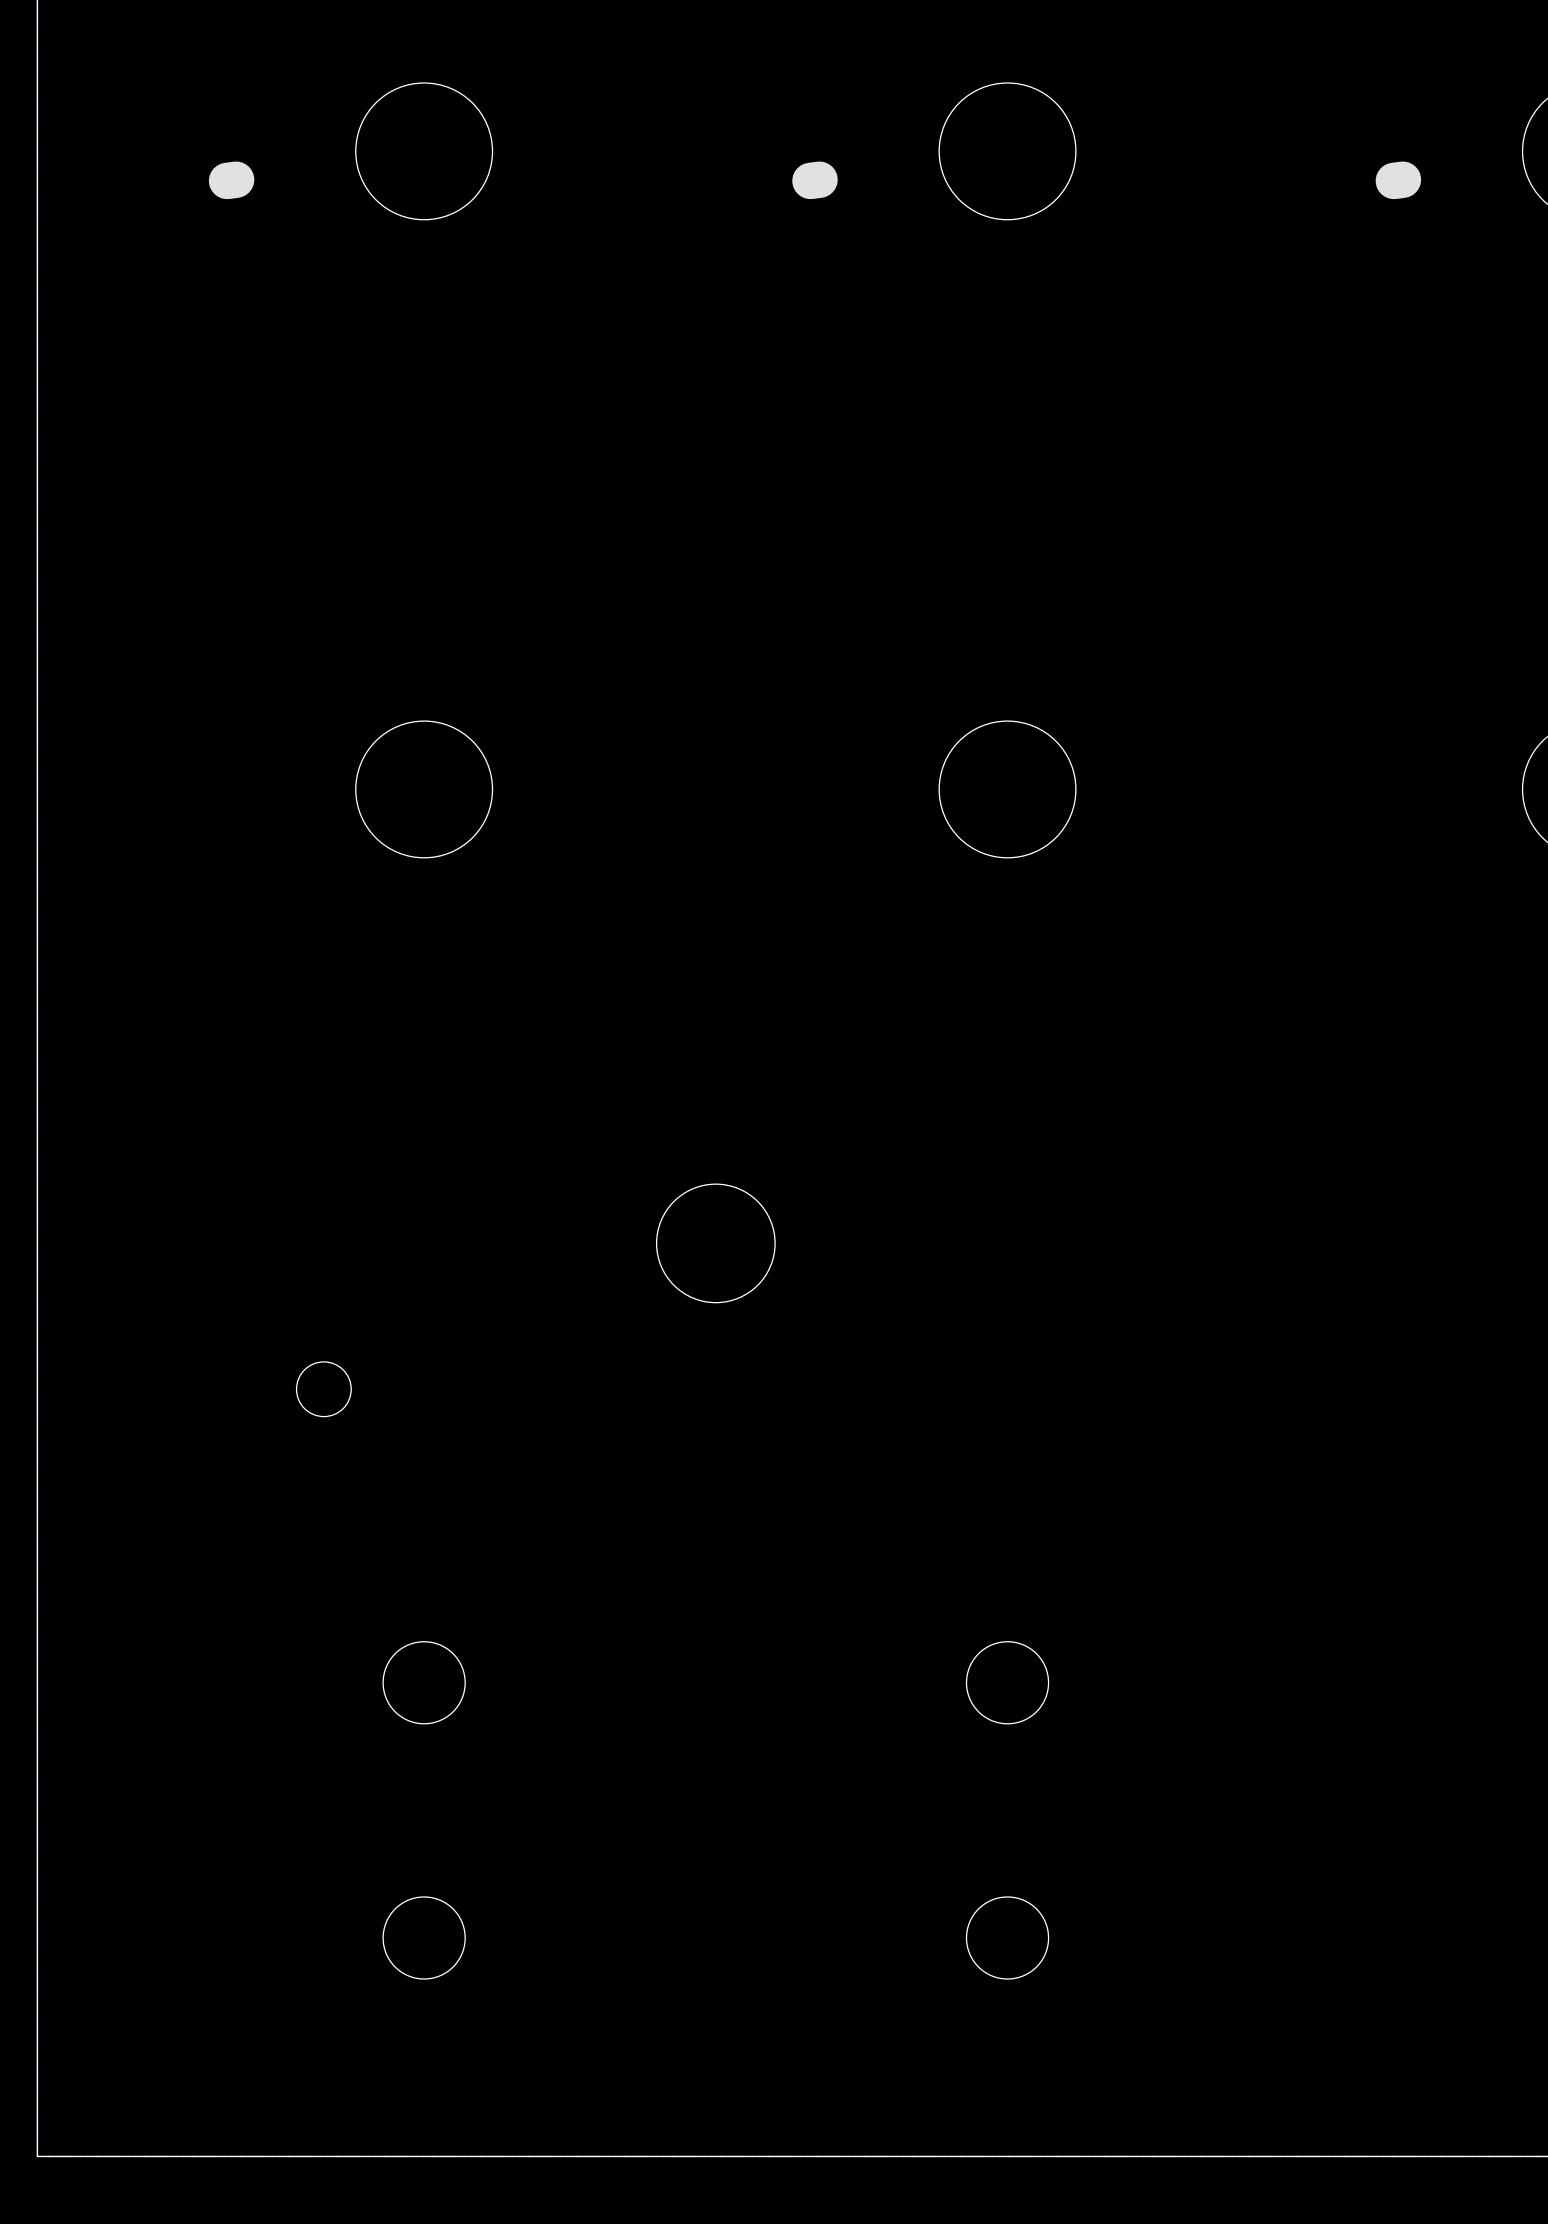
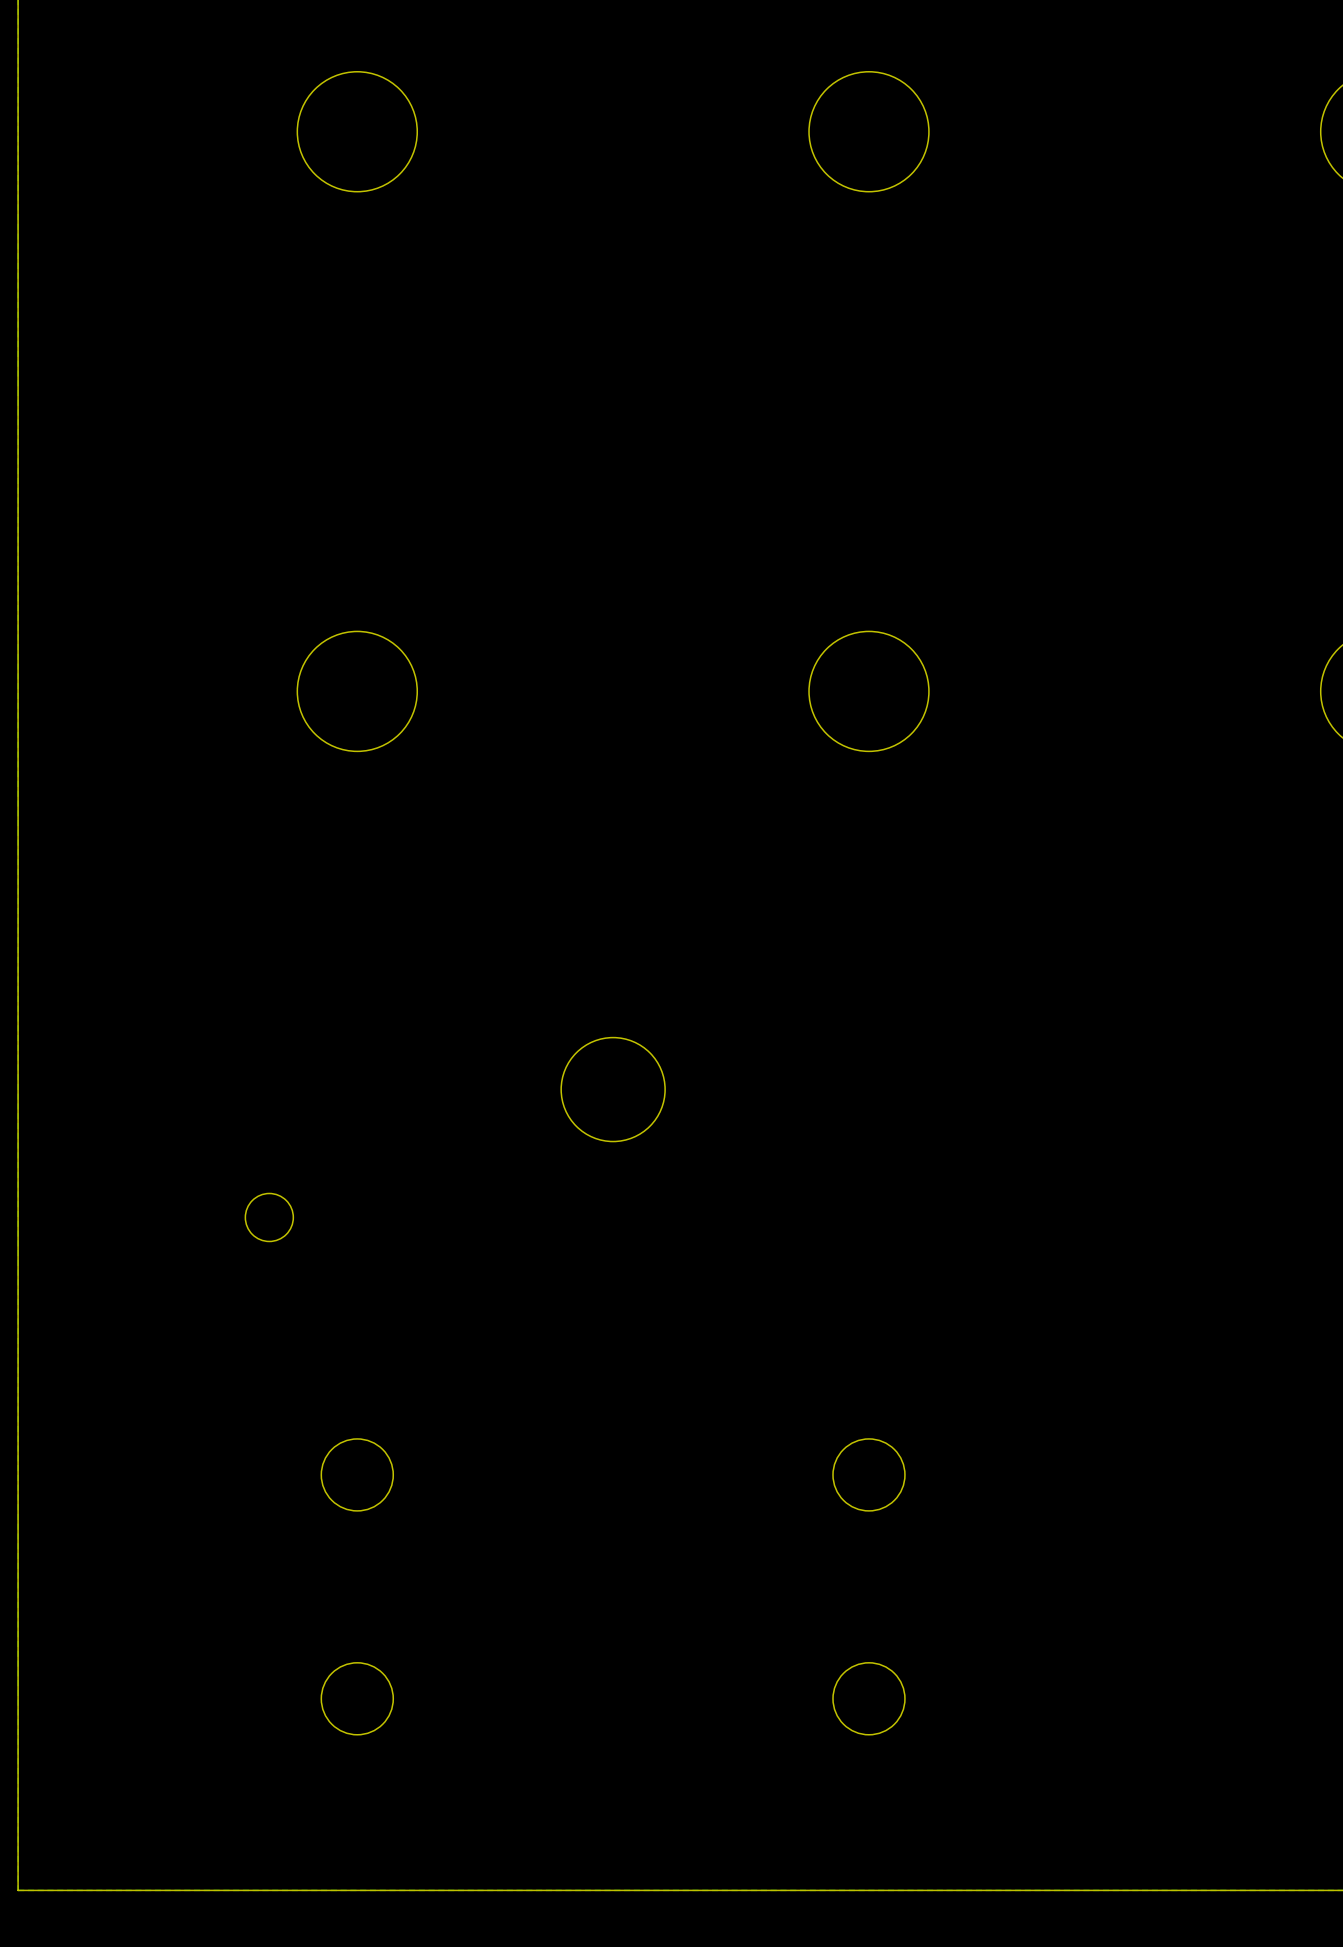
line: (236, 179) (227, 180) -> none
line: (819, 179) (810, 180) -> none
line: (1402, 179) (1393, 180) -> none

